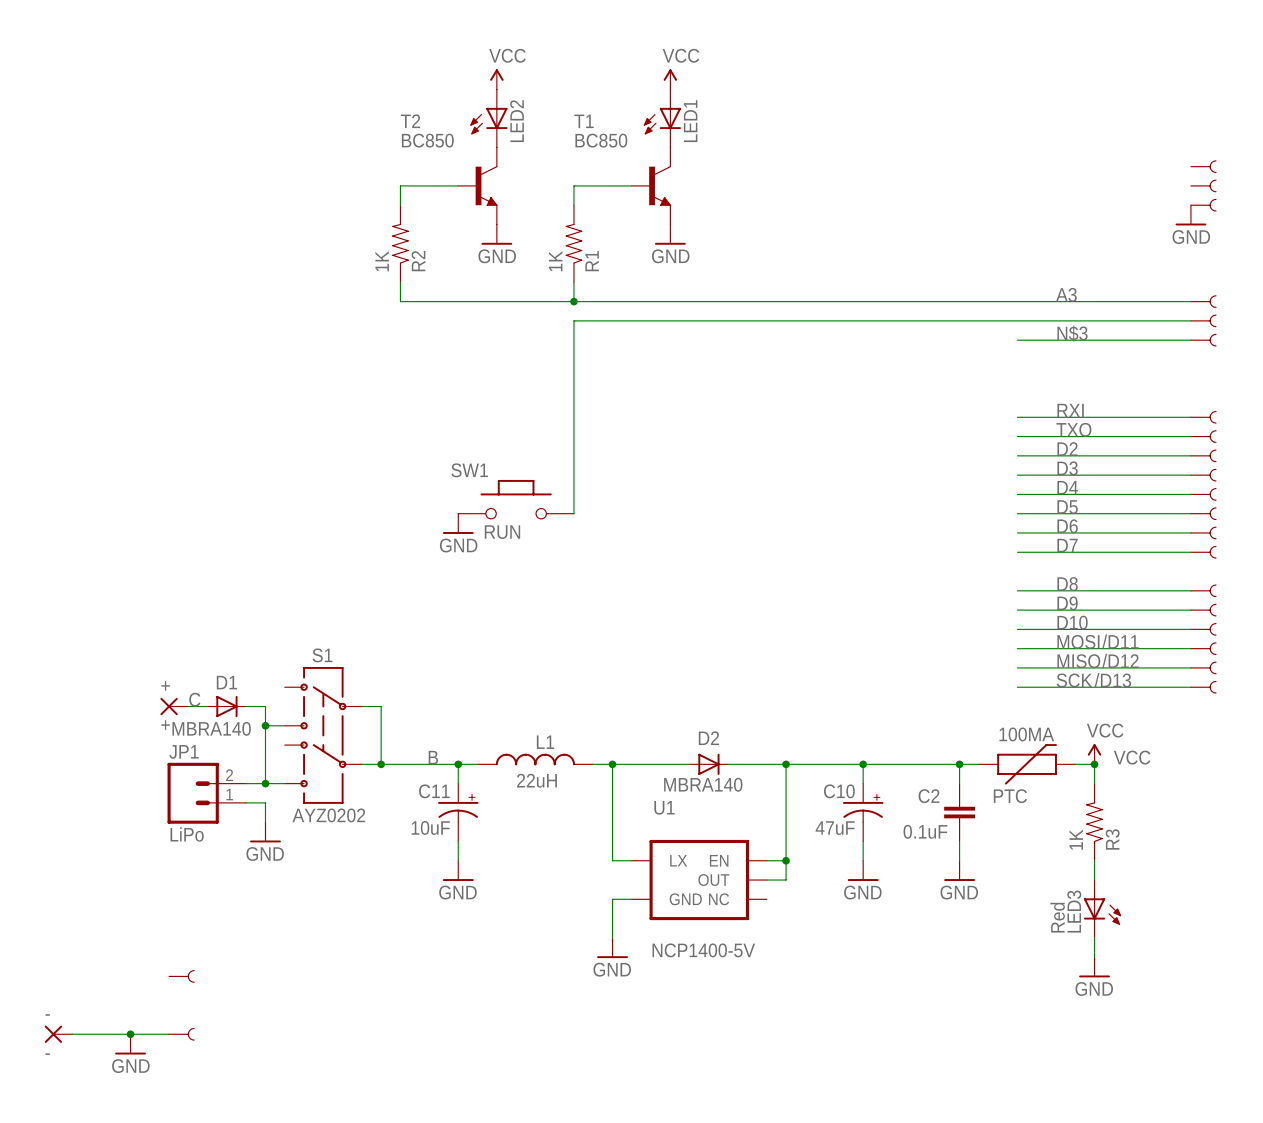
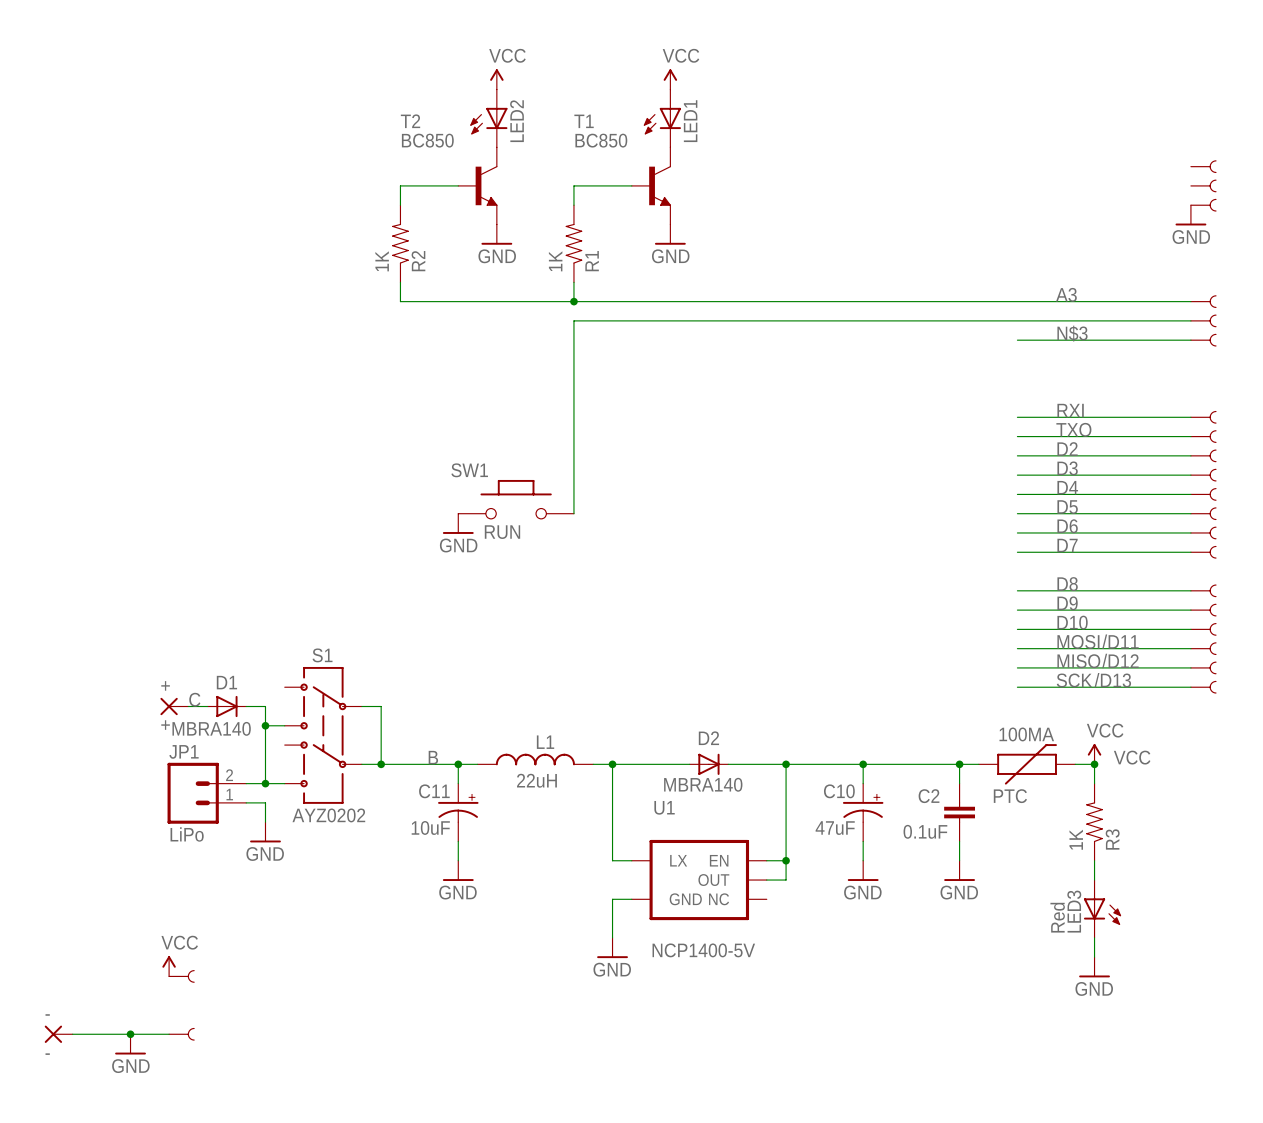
power symbol: none -> VCC (169, 966)

